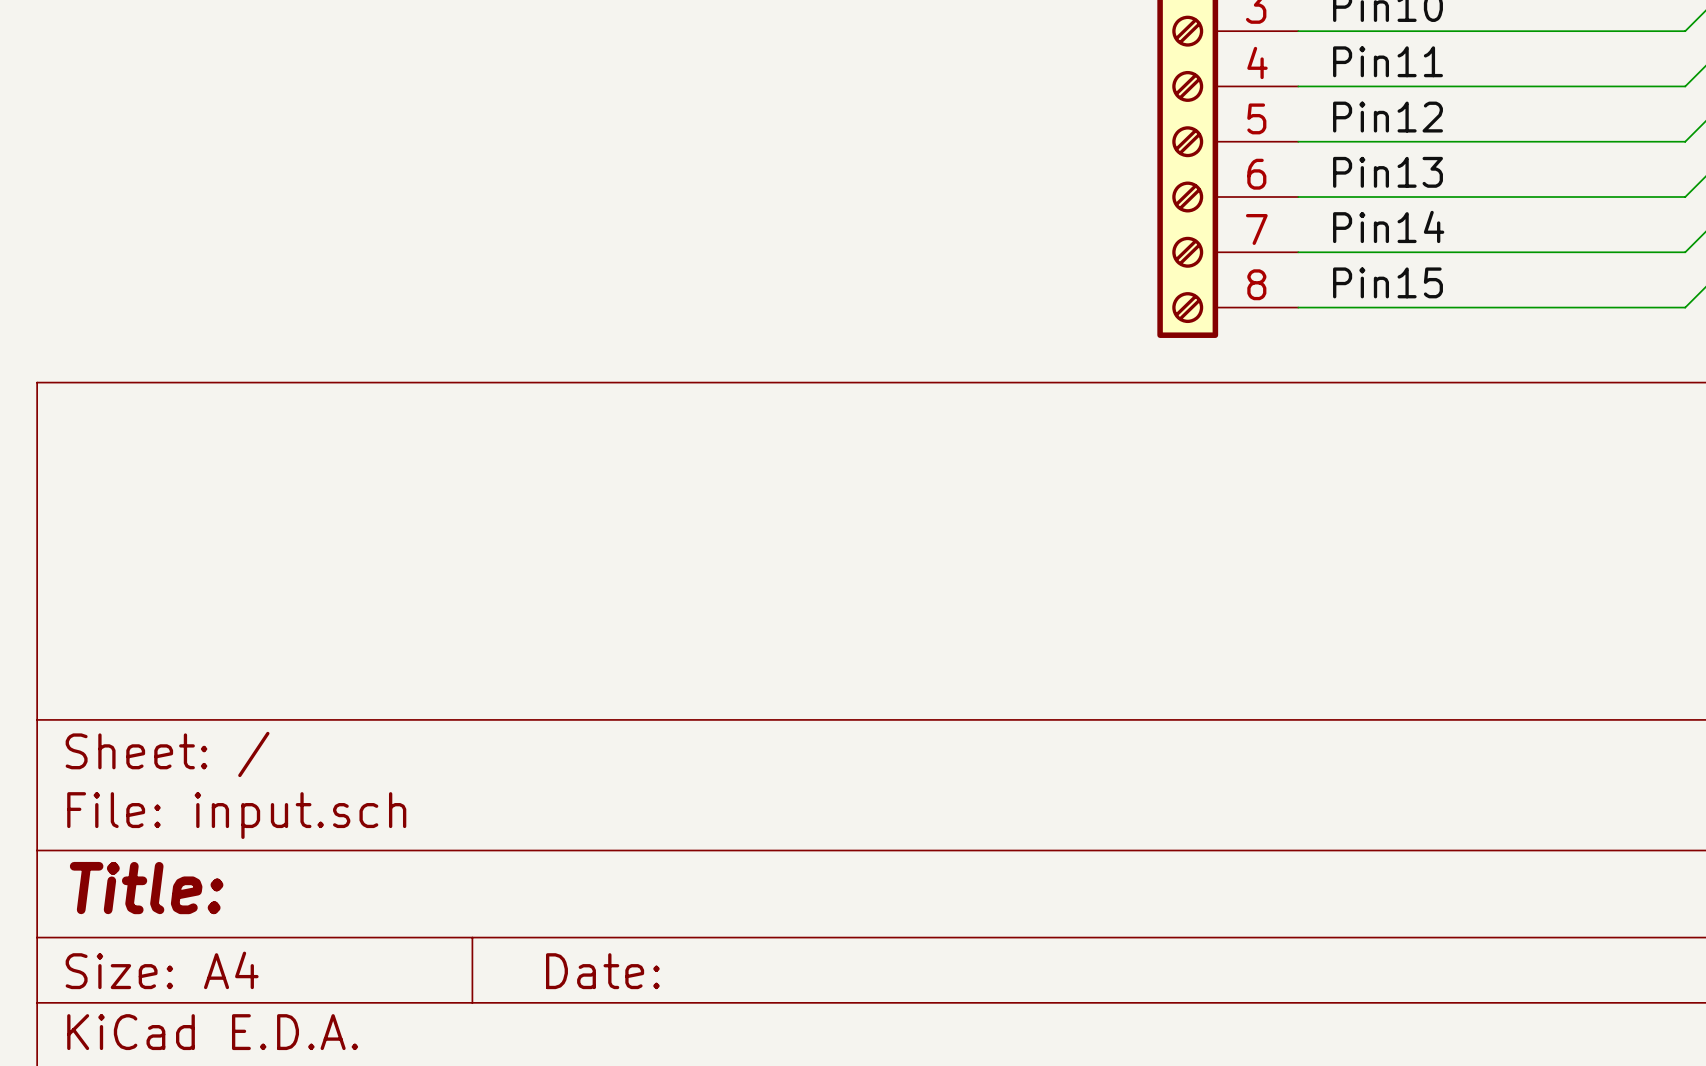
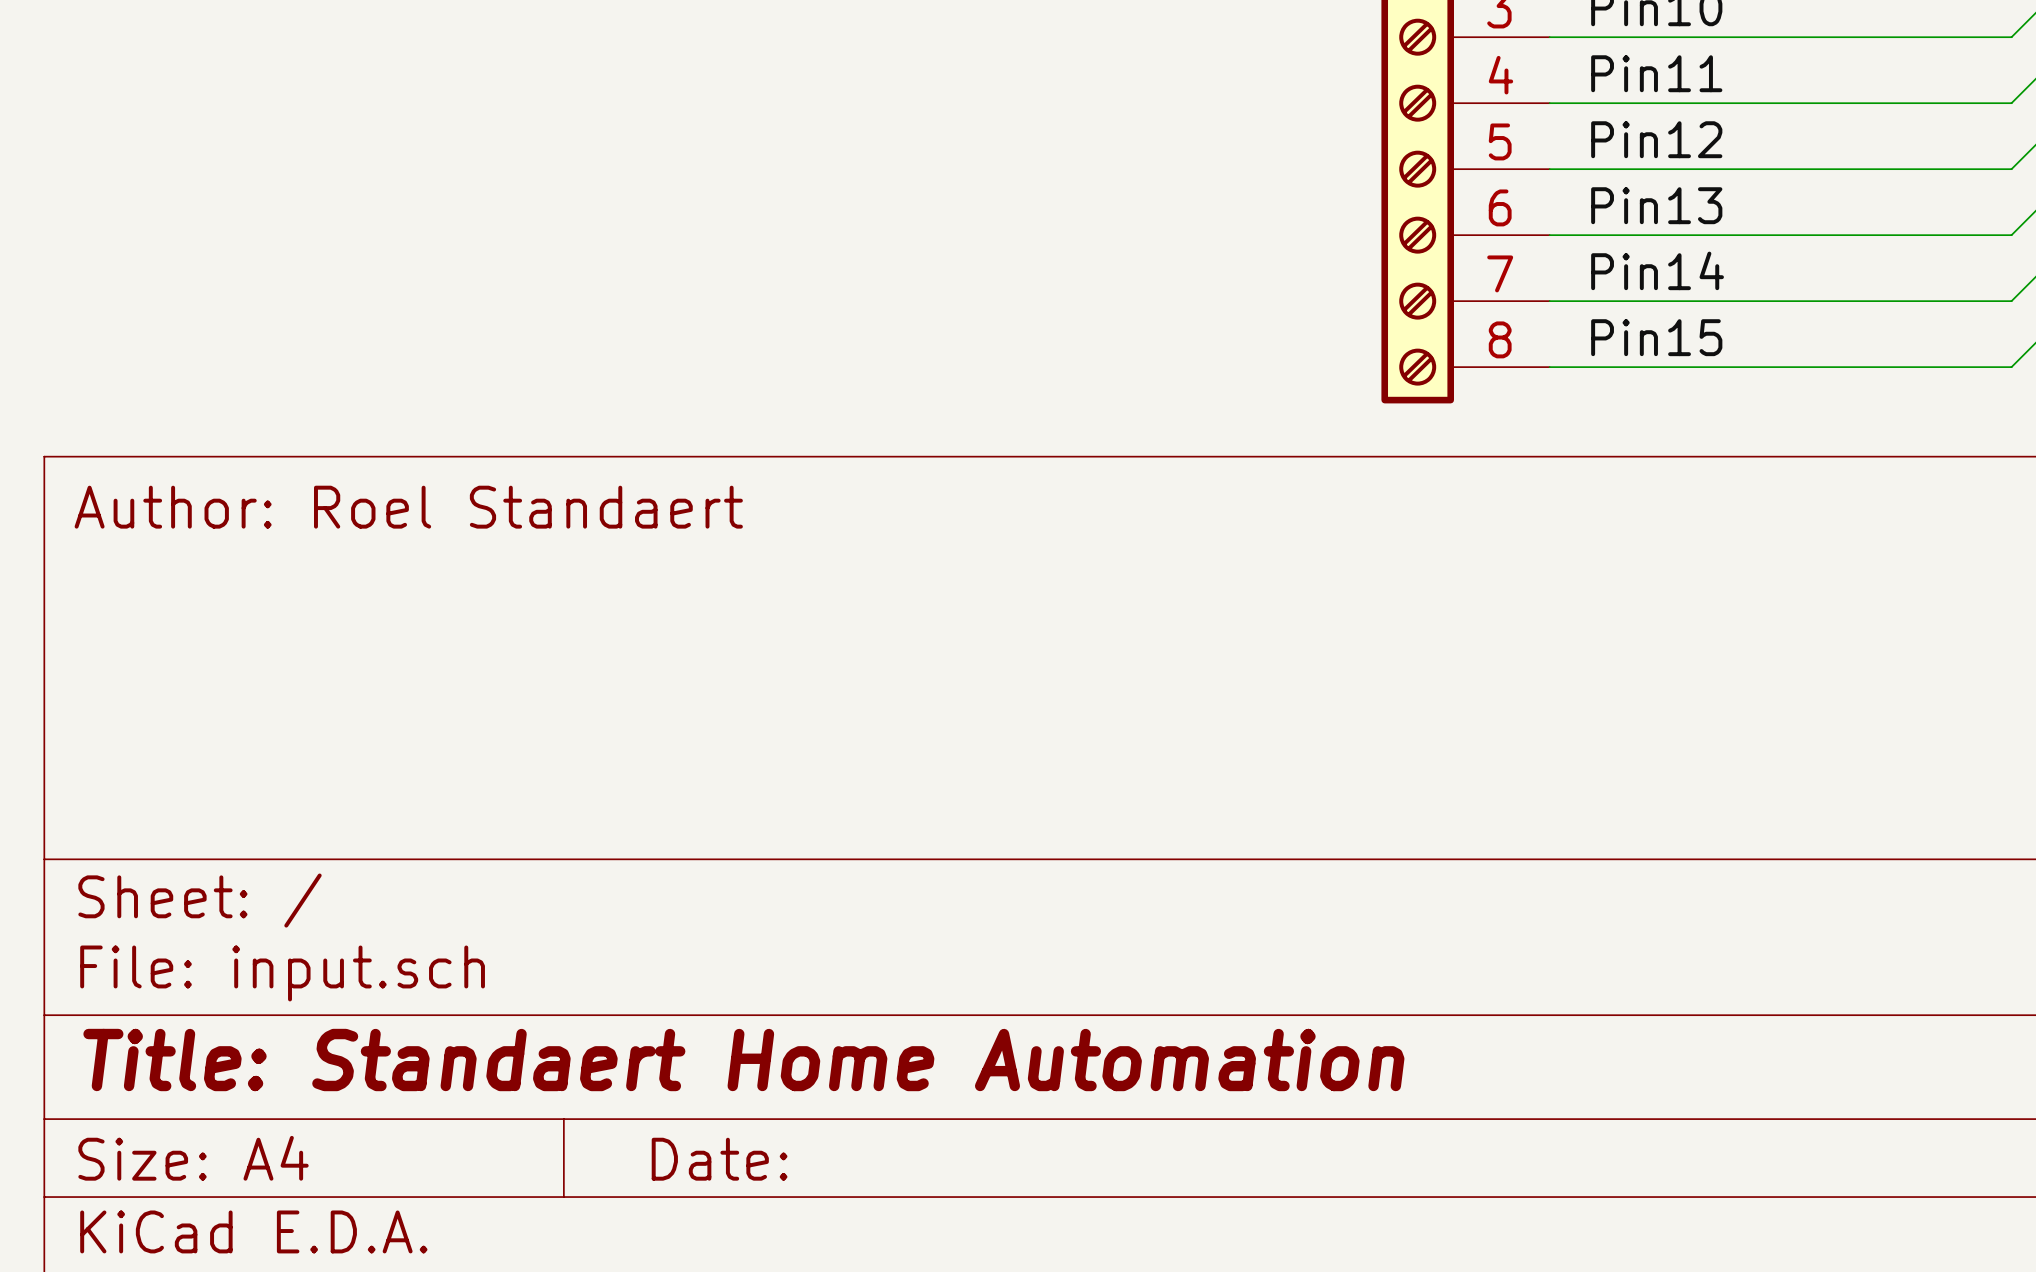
title block: none -> Author: Roel Standaert (408, 507)
title block: Title: (146, 888) -> Title: Standaert Home Automation (743, 1060)

